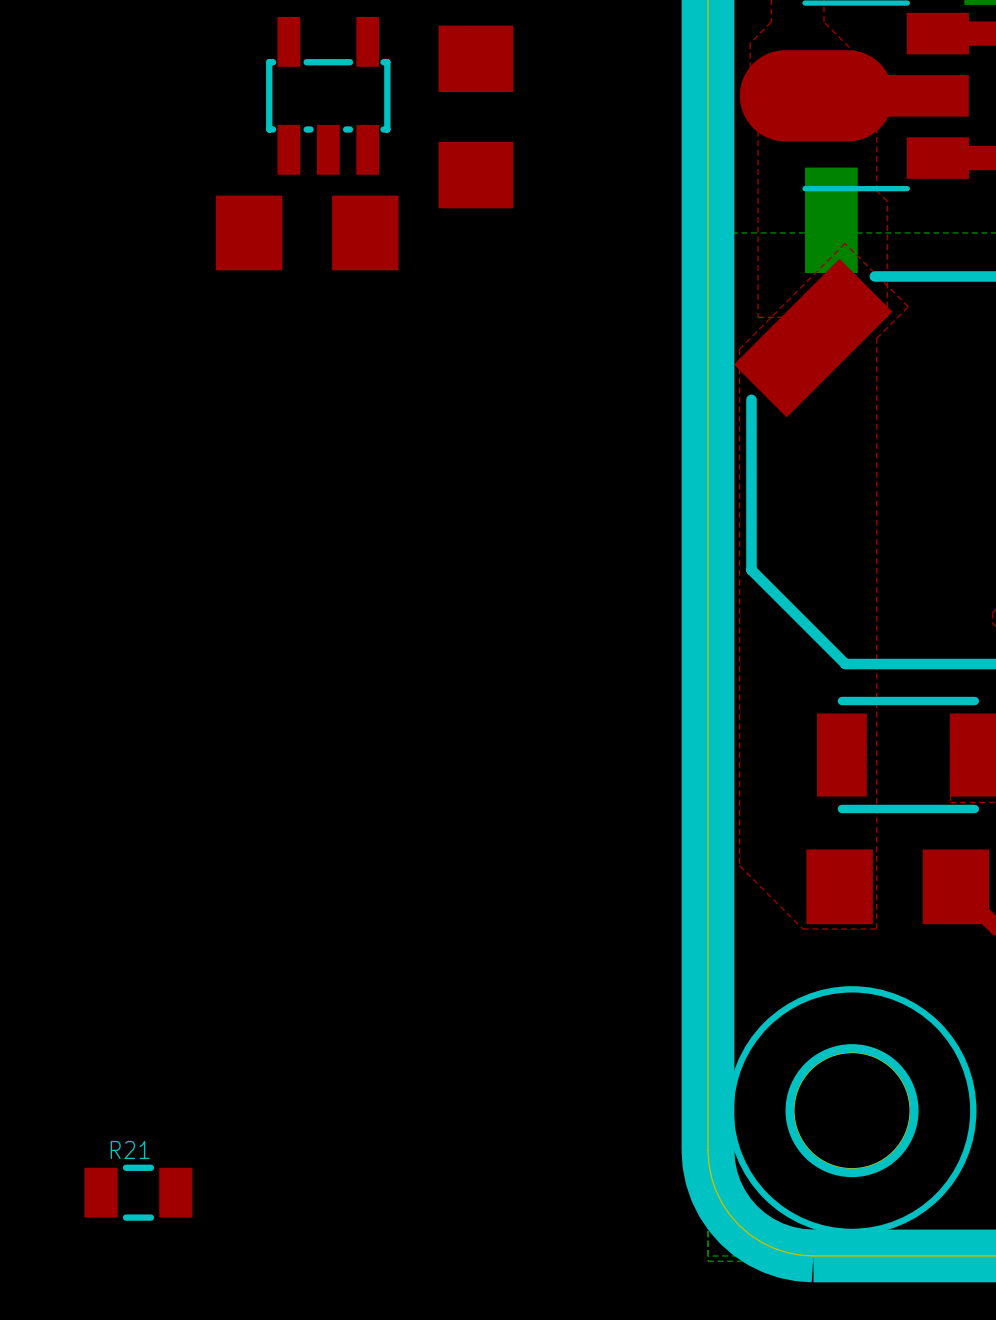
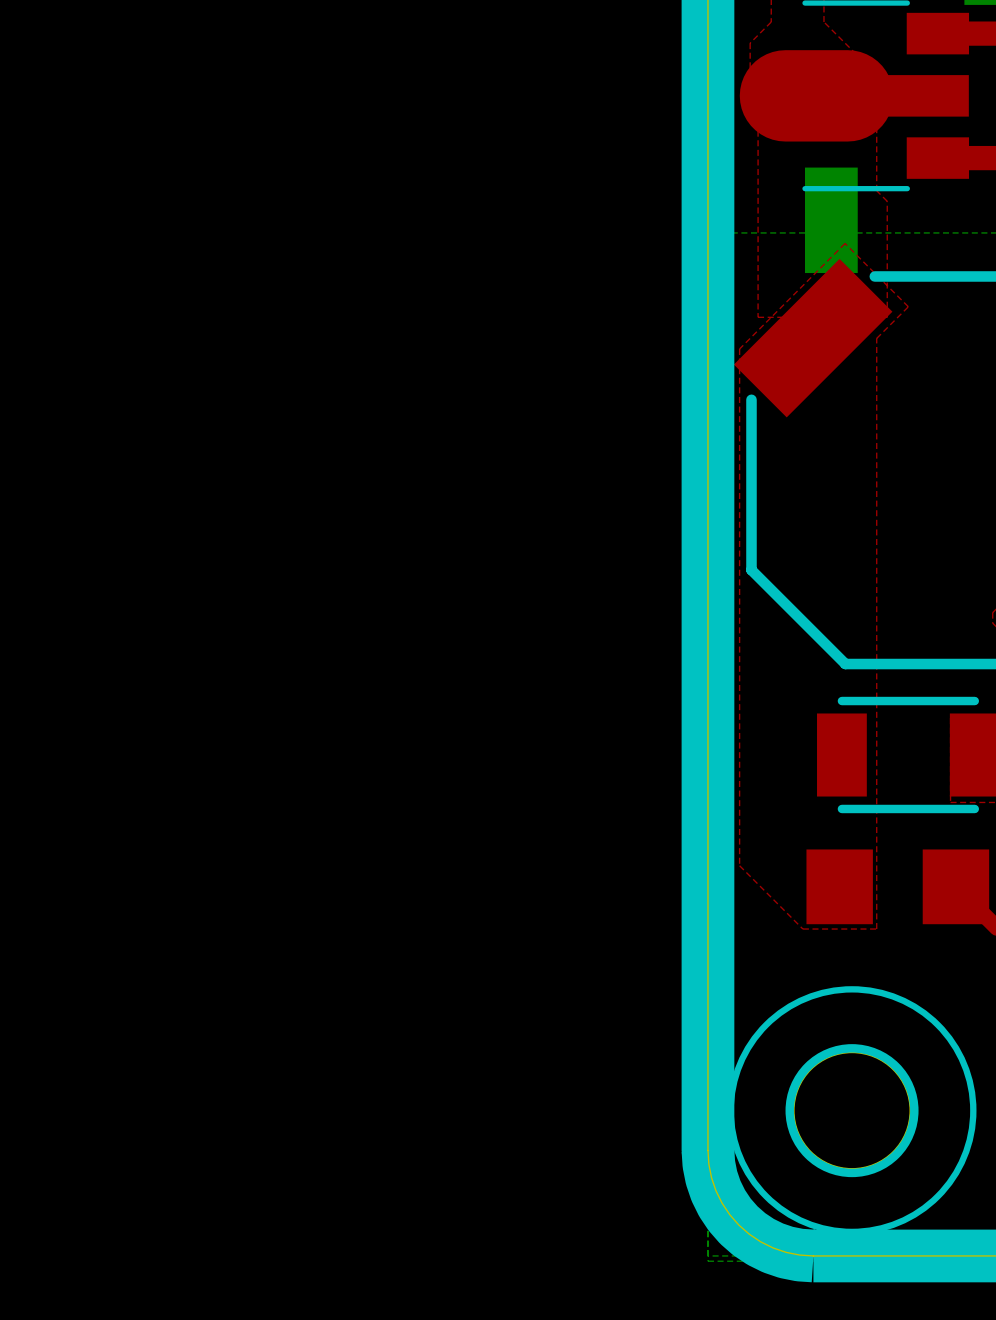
part: (328, 95) -> none
part: (475, 116) -> none
part: (307, 232) -> none
R21: (138, 1192) -> none

